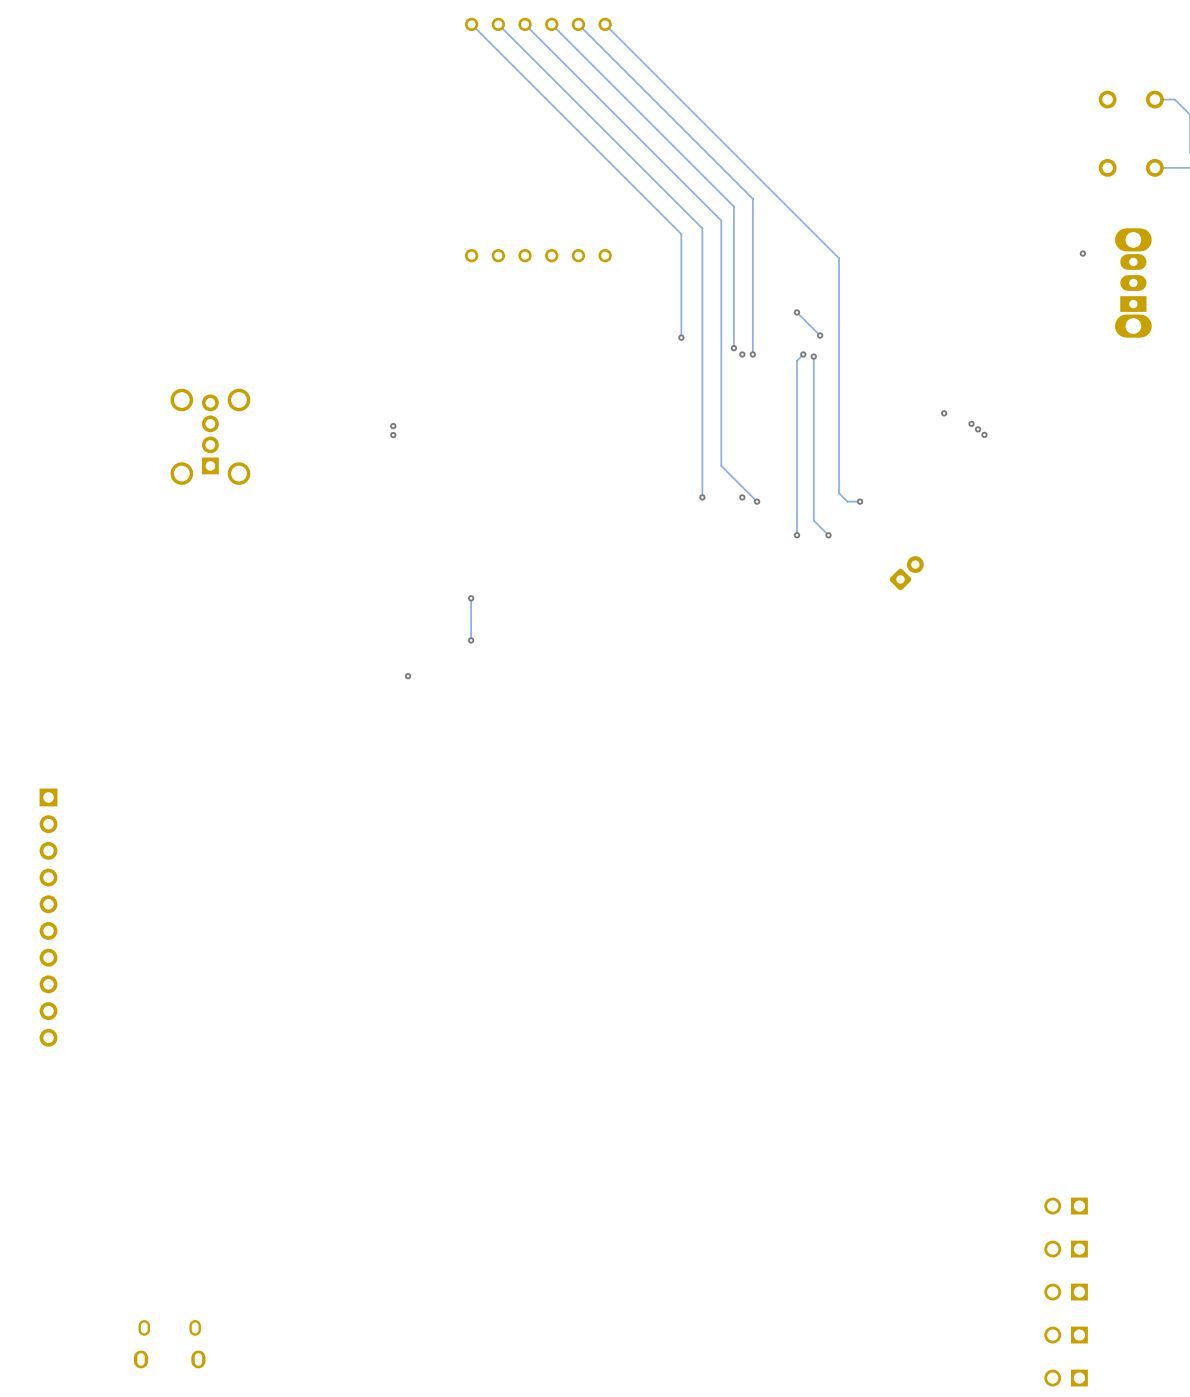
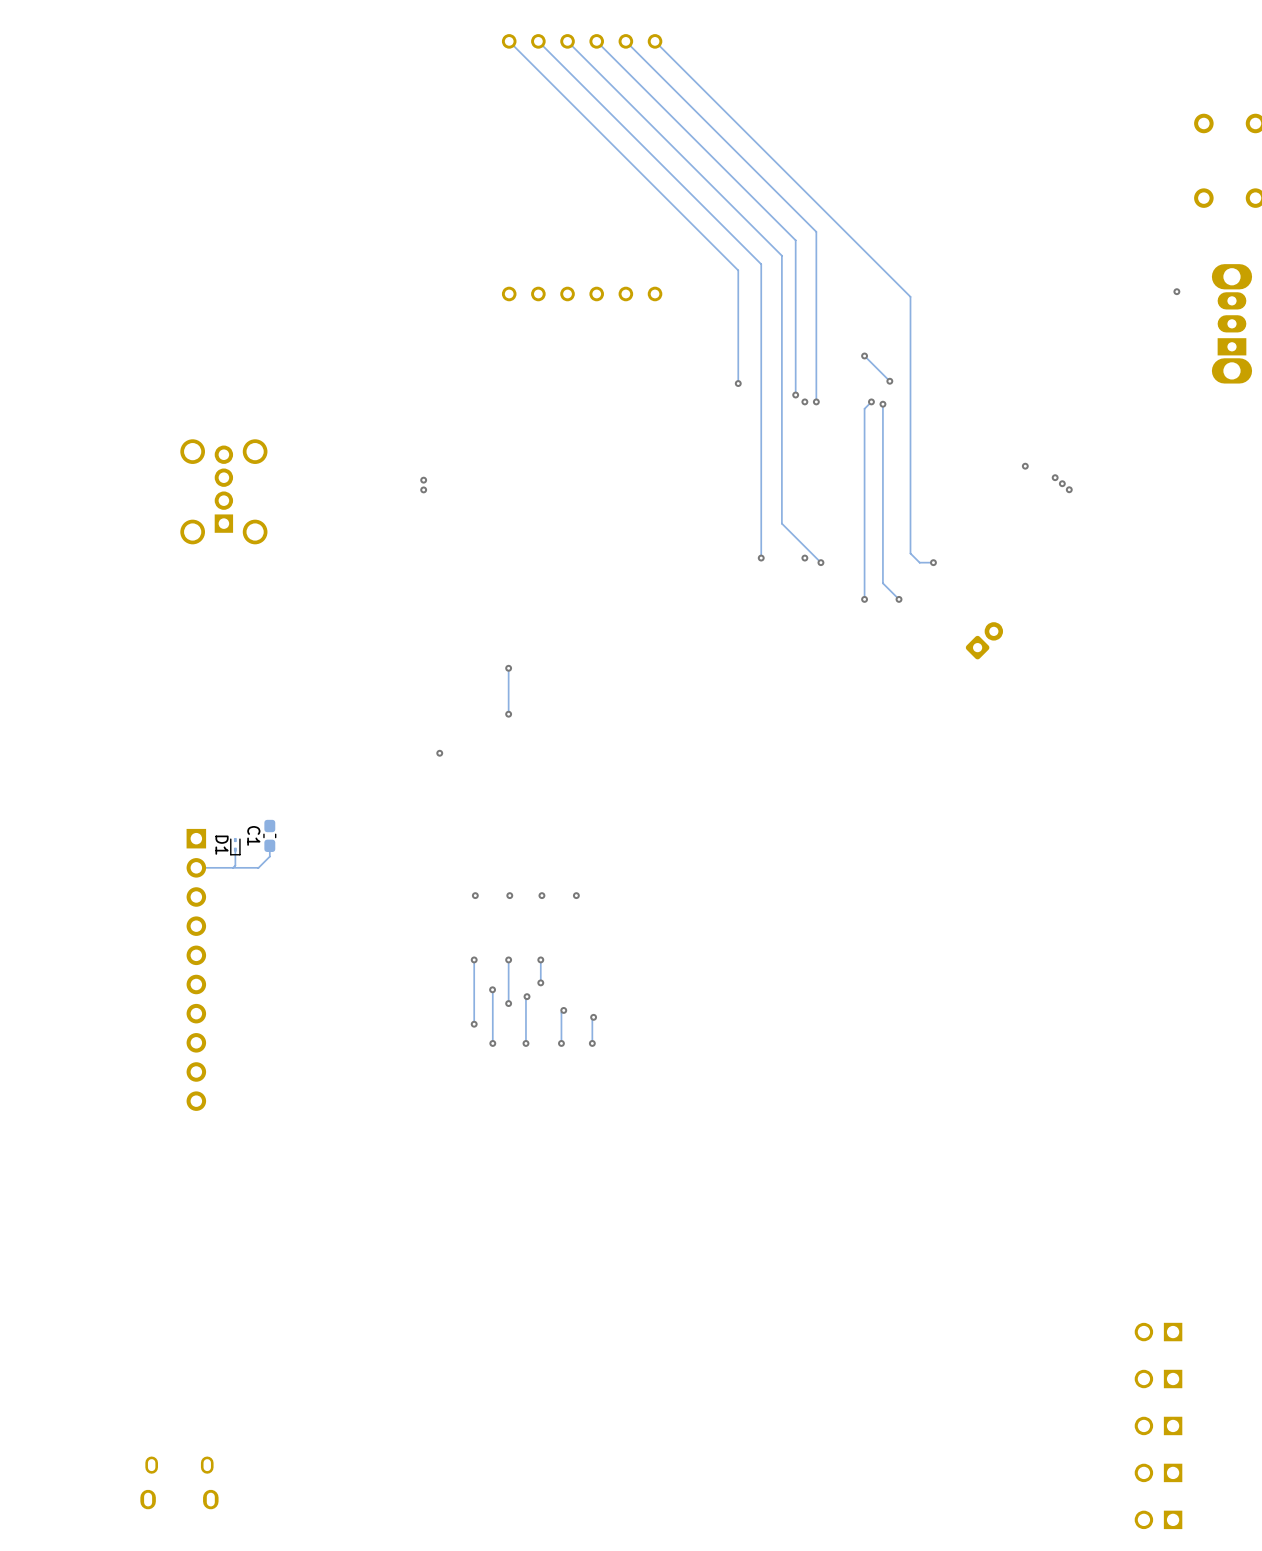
C1: none -> (269, 835)
track: none -> (269, 845) (269, 856) (258, 868) (196, 867)
D1: none -> (235, 846)
track: none -> (235, 849) (235, 865) (233, 867)
via: none -> (475, 895)
via: none -> (509, 895)
via: none -> (541, 895)
via: none -> (576, 895)
track: none -> (474, 959) (474, 1024)
via: none -> (474, 959)
track: none -> (508, 959) (508, 1003)
via: none -> (508, 959)
track: none -> (540, 959) (540, 982)
via: none -> (540, 959)
via: none -> (540, 982)
track: none -> (492, 989) (492, 1043)
via: none -> (492, 989)
track: none -> (527, 996) (525, 1043)
via: none -> (527, 996)
via: none -> (508, 1003)
track: none -> (563, 1010) (561, 1012) (561, 1043)
via: none -> (563, 1010)
part position: (48, 917) -> (196, 969)
track: none -> (593, 1017) (592, 1043)
via: none -> (593, 1017)
via: none -> (474, 1024)
via: none -> (492, 1043)
via: none -> (525, 1043)
via: none -> (561, 1043)
via: none -> (592, 1043)

